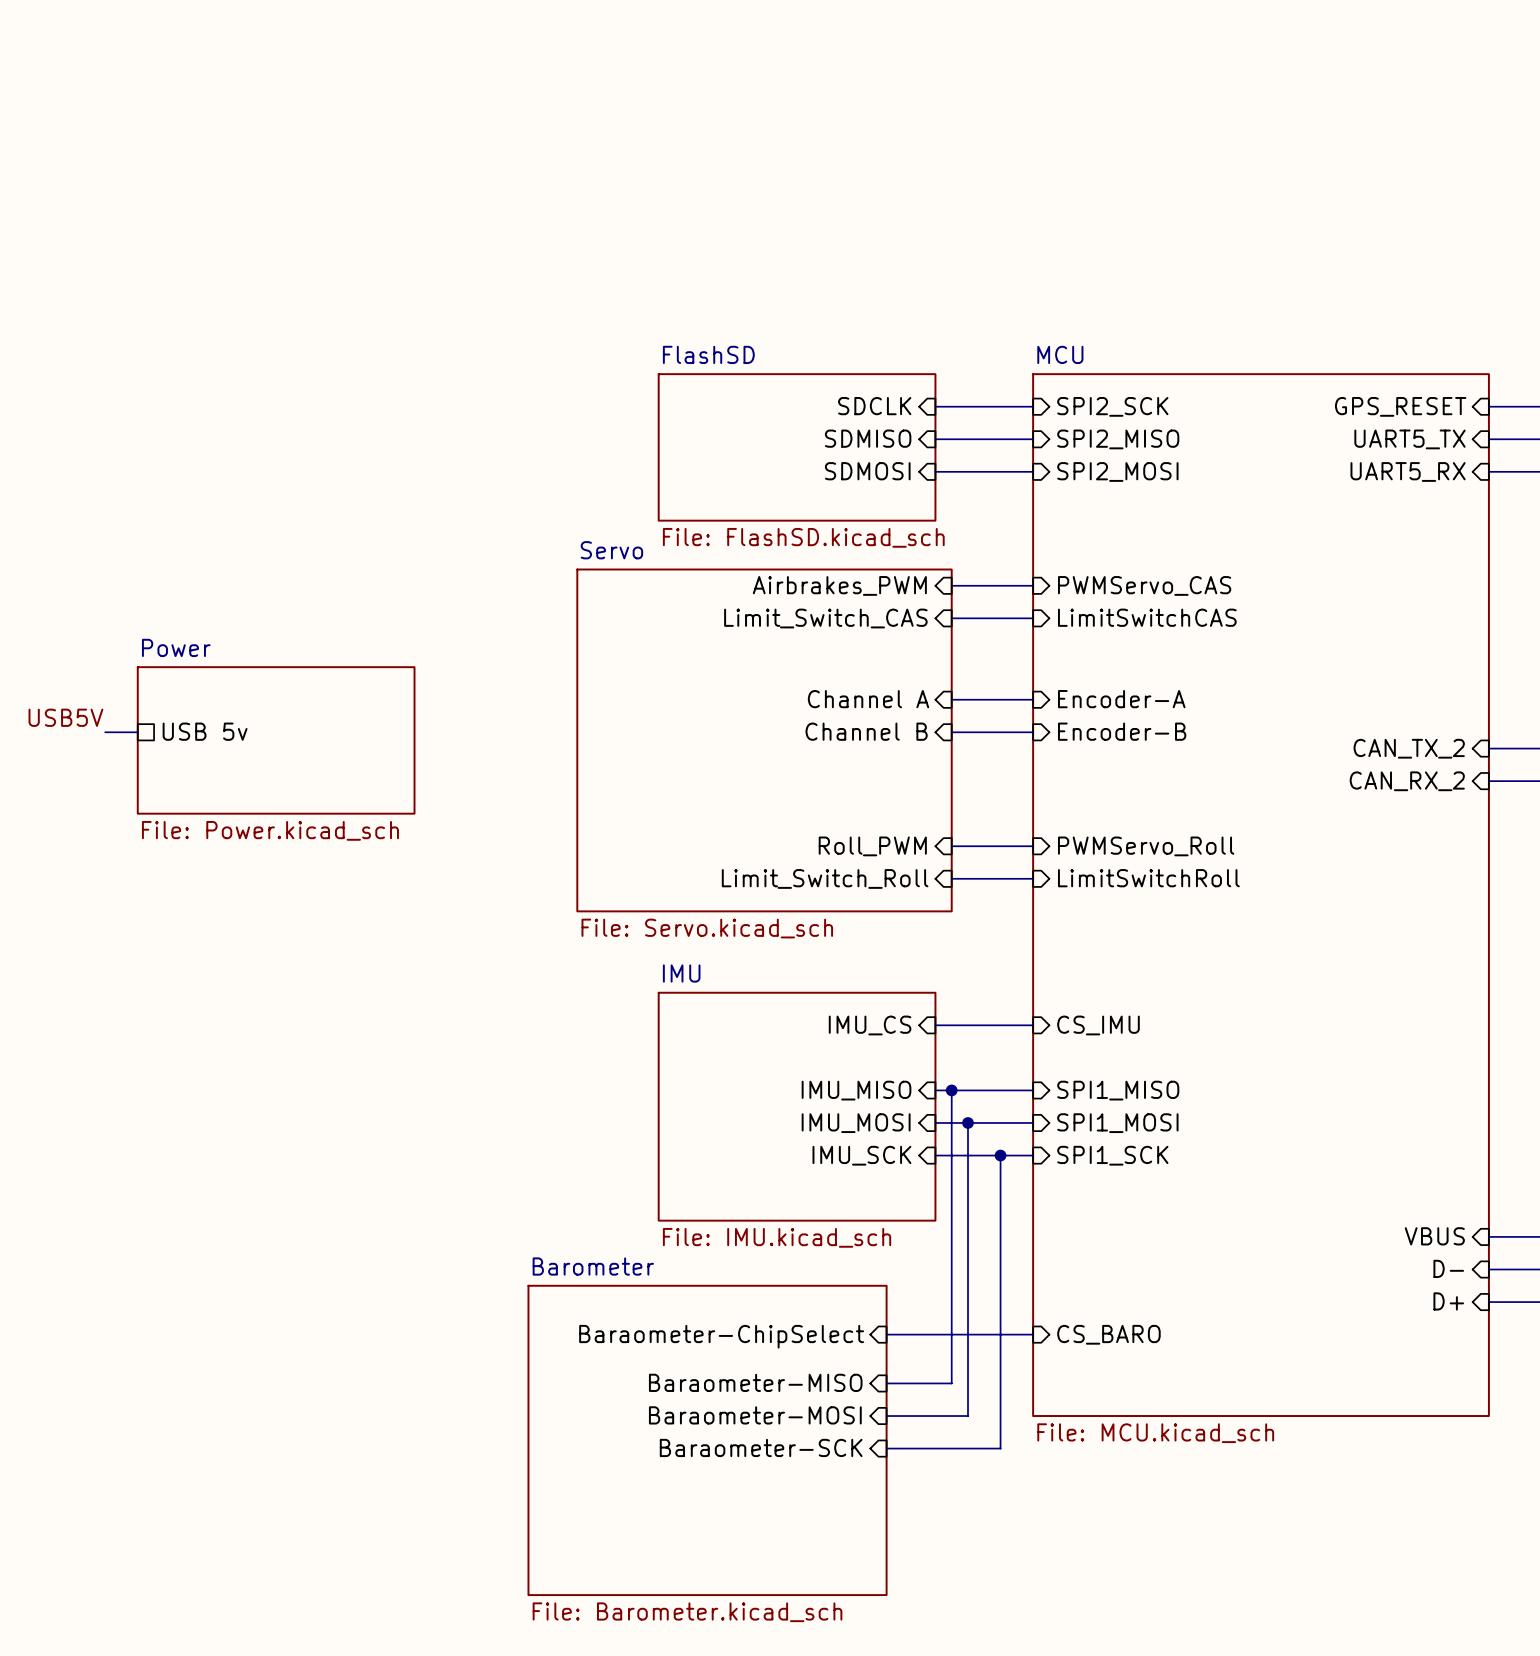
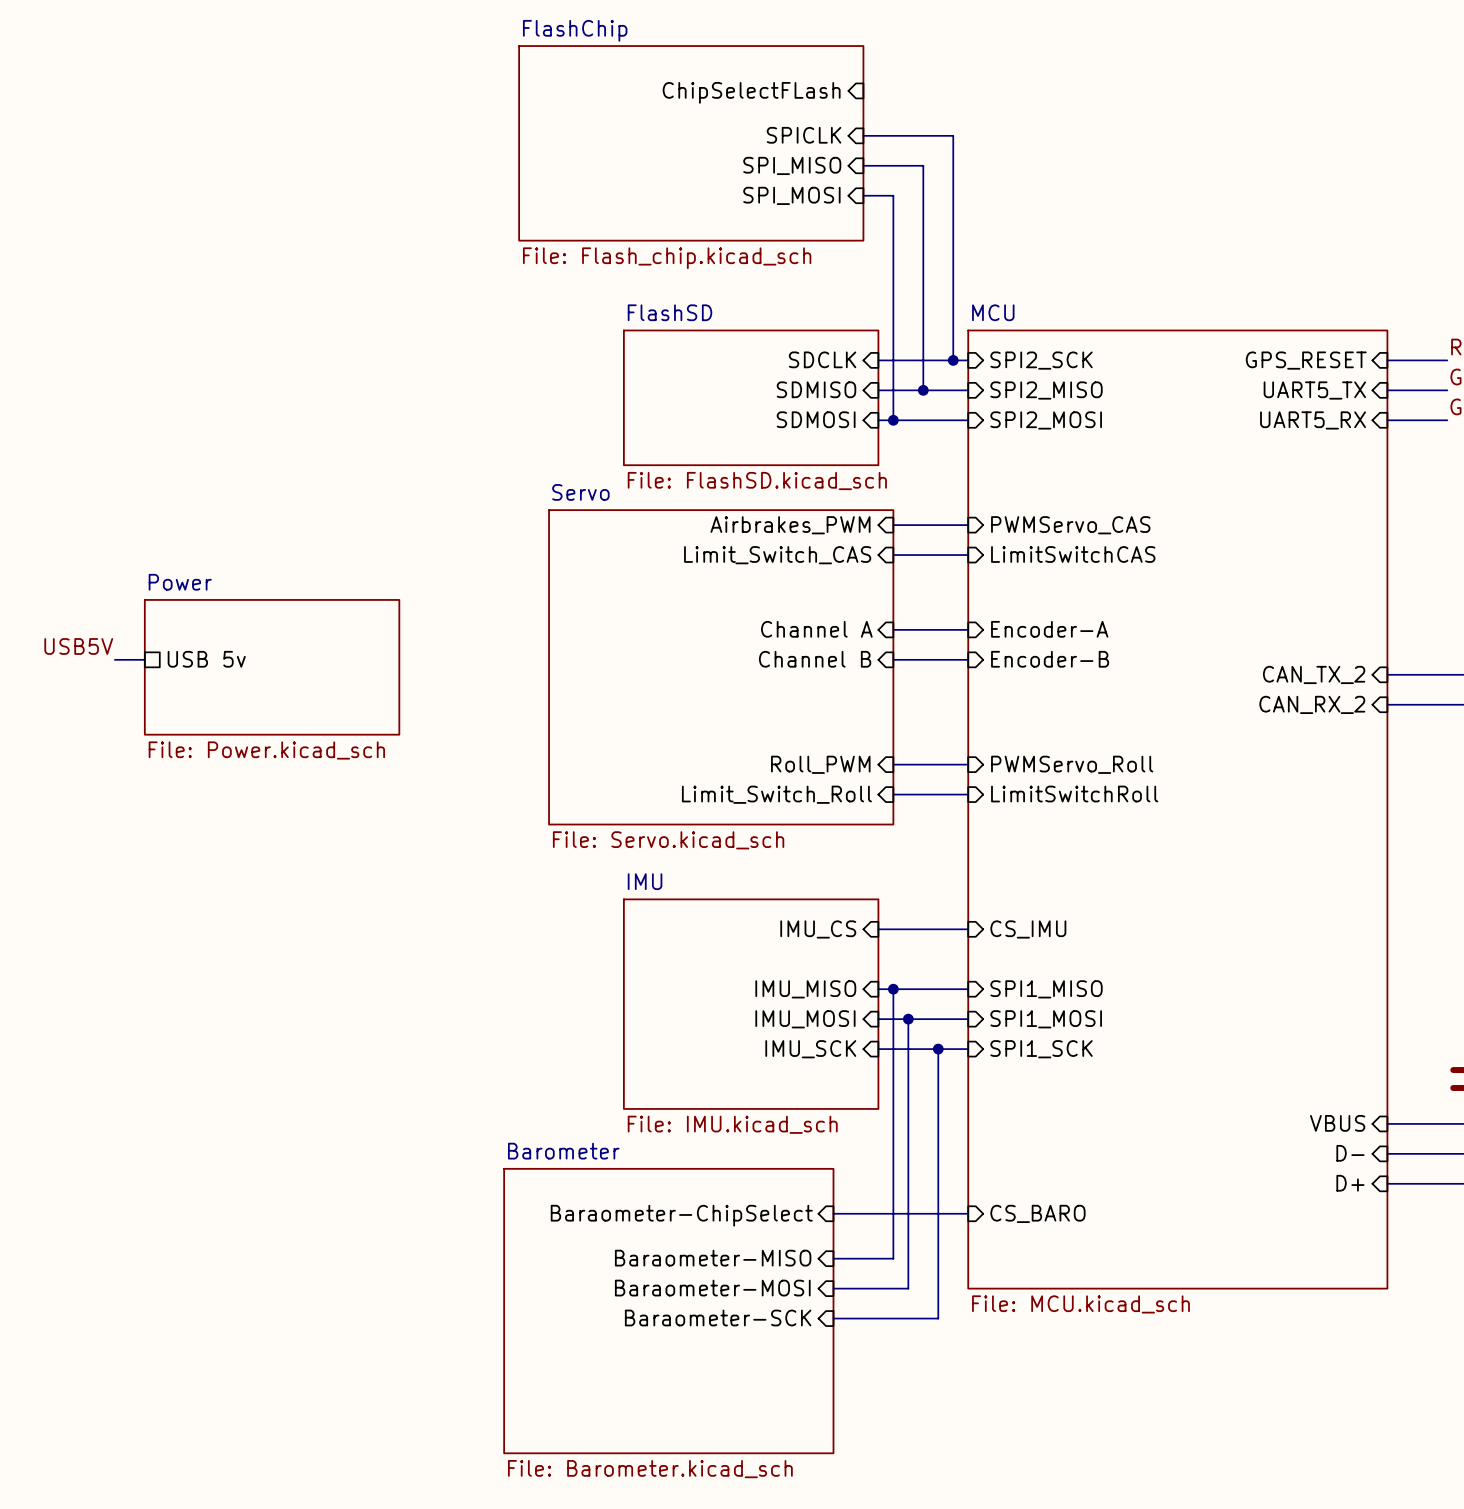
sheet pin: none -> ChipSelectFLash (751, 92)
sheet pin: none -> SPICLK (804, 135)
wire: none -> (863, 135) (953, 135) (953, 360)
sheet FlashChip: none -> File: Flash_chip.kicad_sch (691, 143)
sheet pin: none -> SPI_MISO (792, 165)
wire: none -> (863, 165) (923, 165) (923, 390)
sheet pin: none -> SPI_MOSI (791, 195)
wire: none -> (863, 195) (893, 195) (893, 420)
junction: none -> (953, 360)
junction: none -> (923, 390)
junction: none -> (893, 420)

